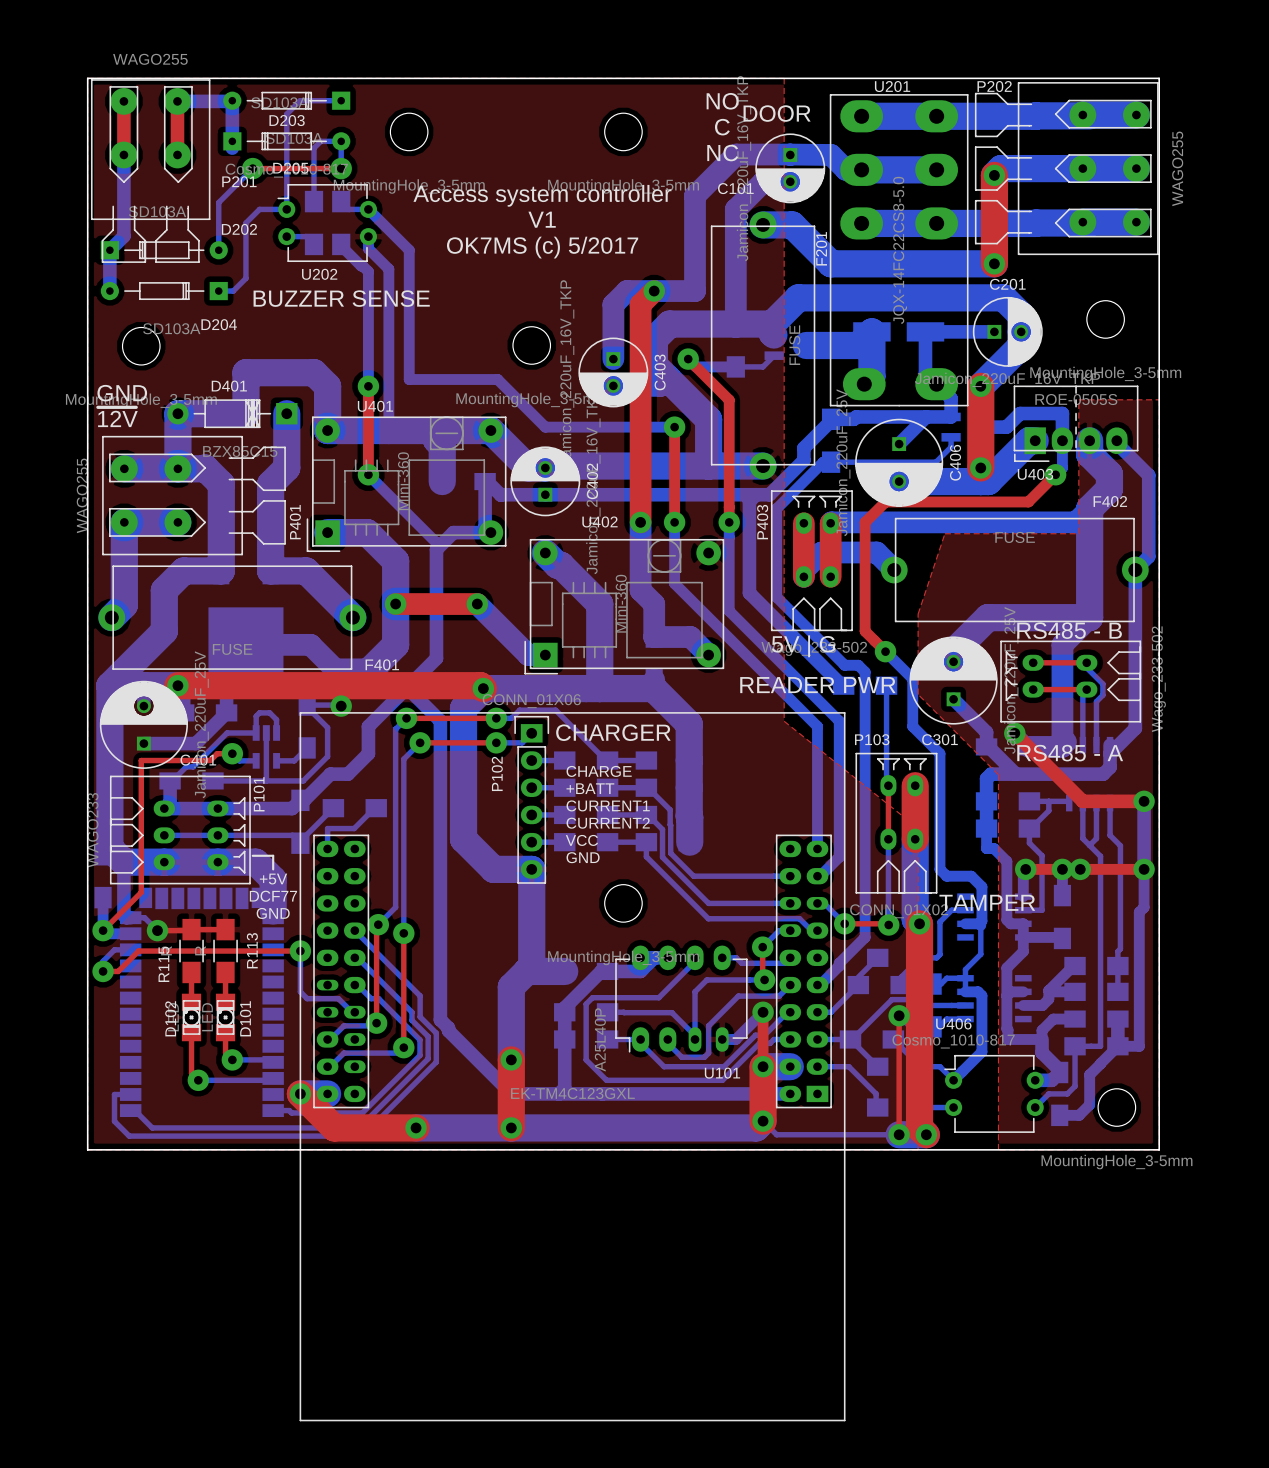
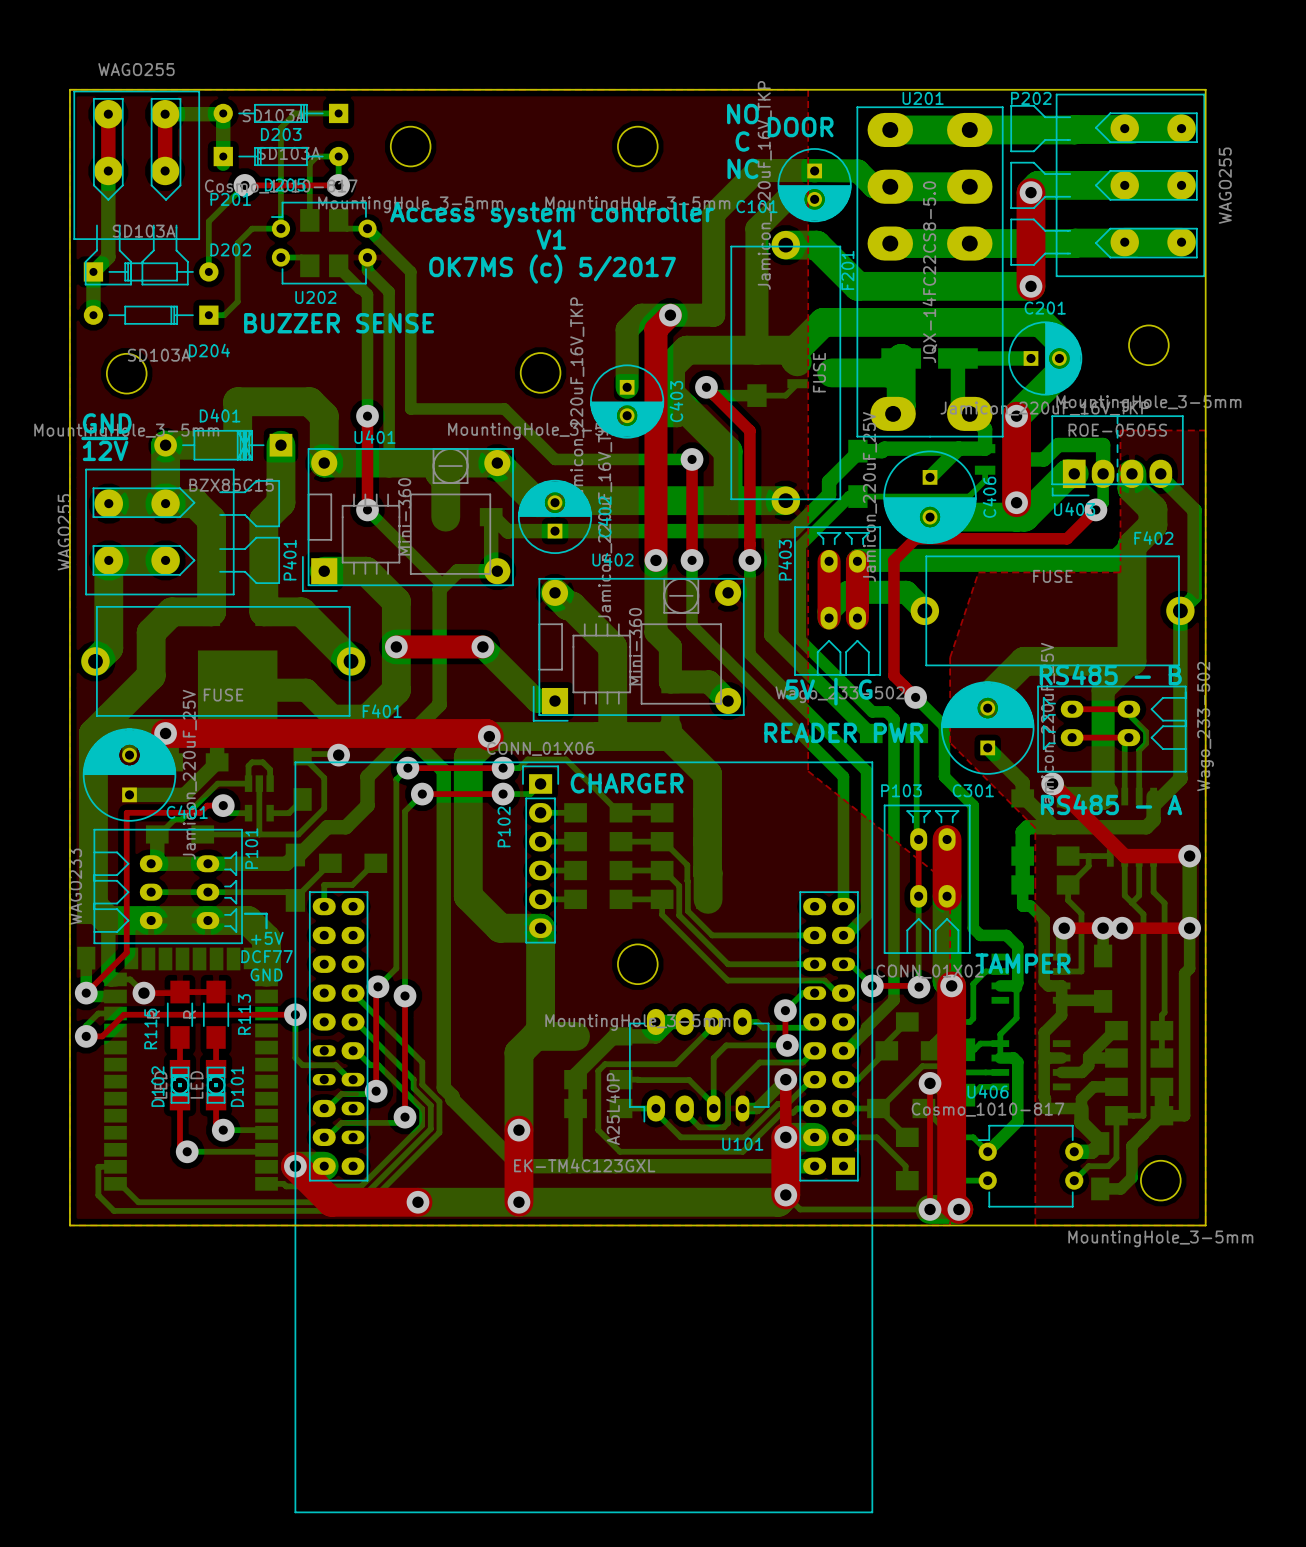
text: CHARGE (599, 771) -> none
text: +BATT (590, 788) -> none
text: CURRENT1 (608, 805) -> none
text: CURRENT2 (608, 823) -> none
text: VCC (581, 840) -> none
text: GND (583, 857) -> none

